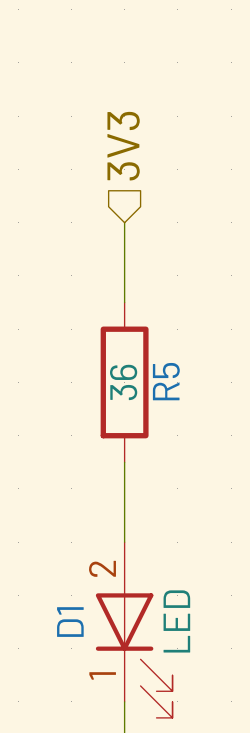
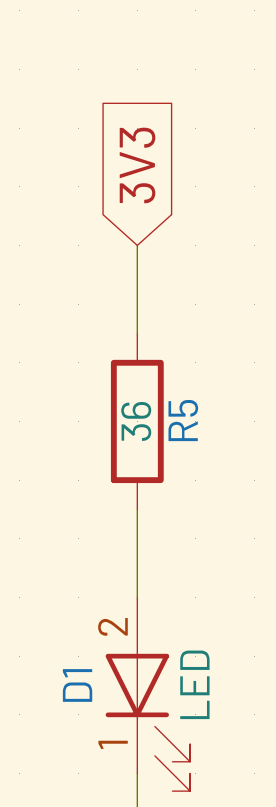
hierarchical label: 3V3 (123, 146) -> none
global label: none -> 3V3 (137, 165)

